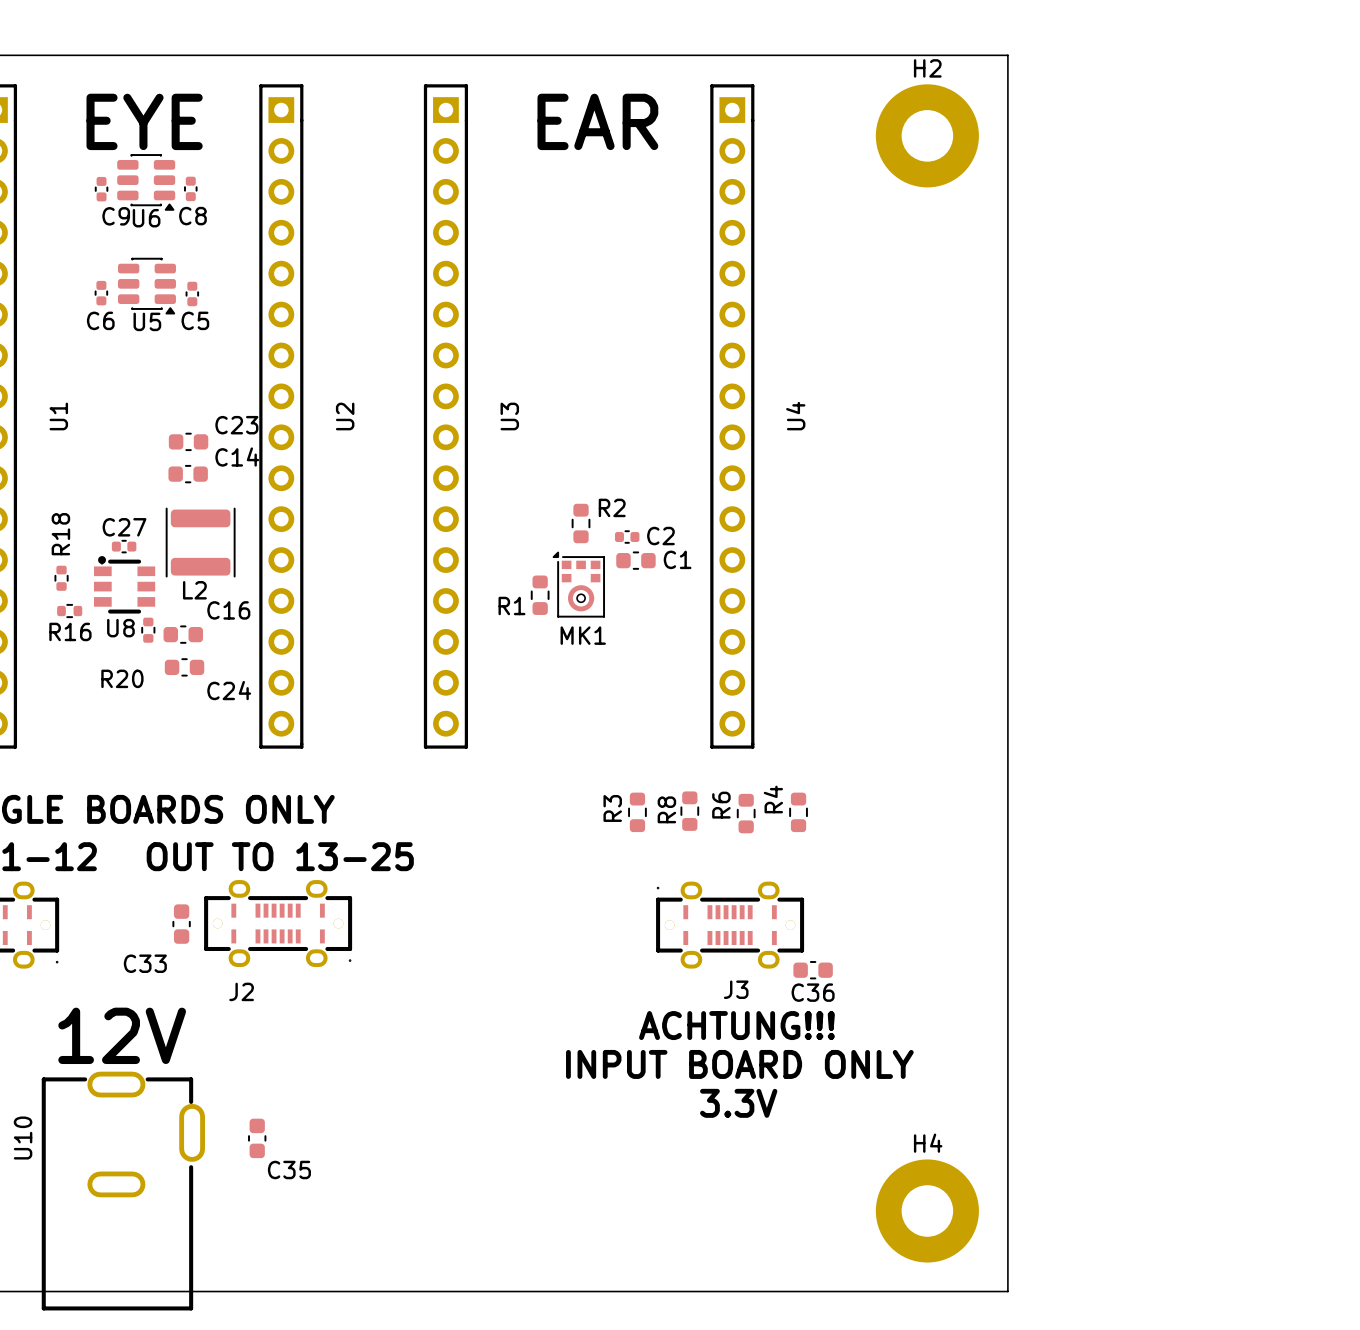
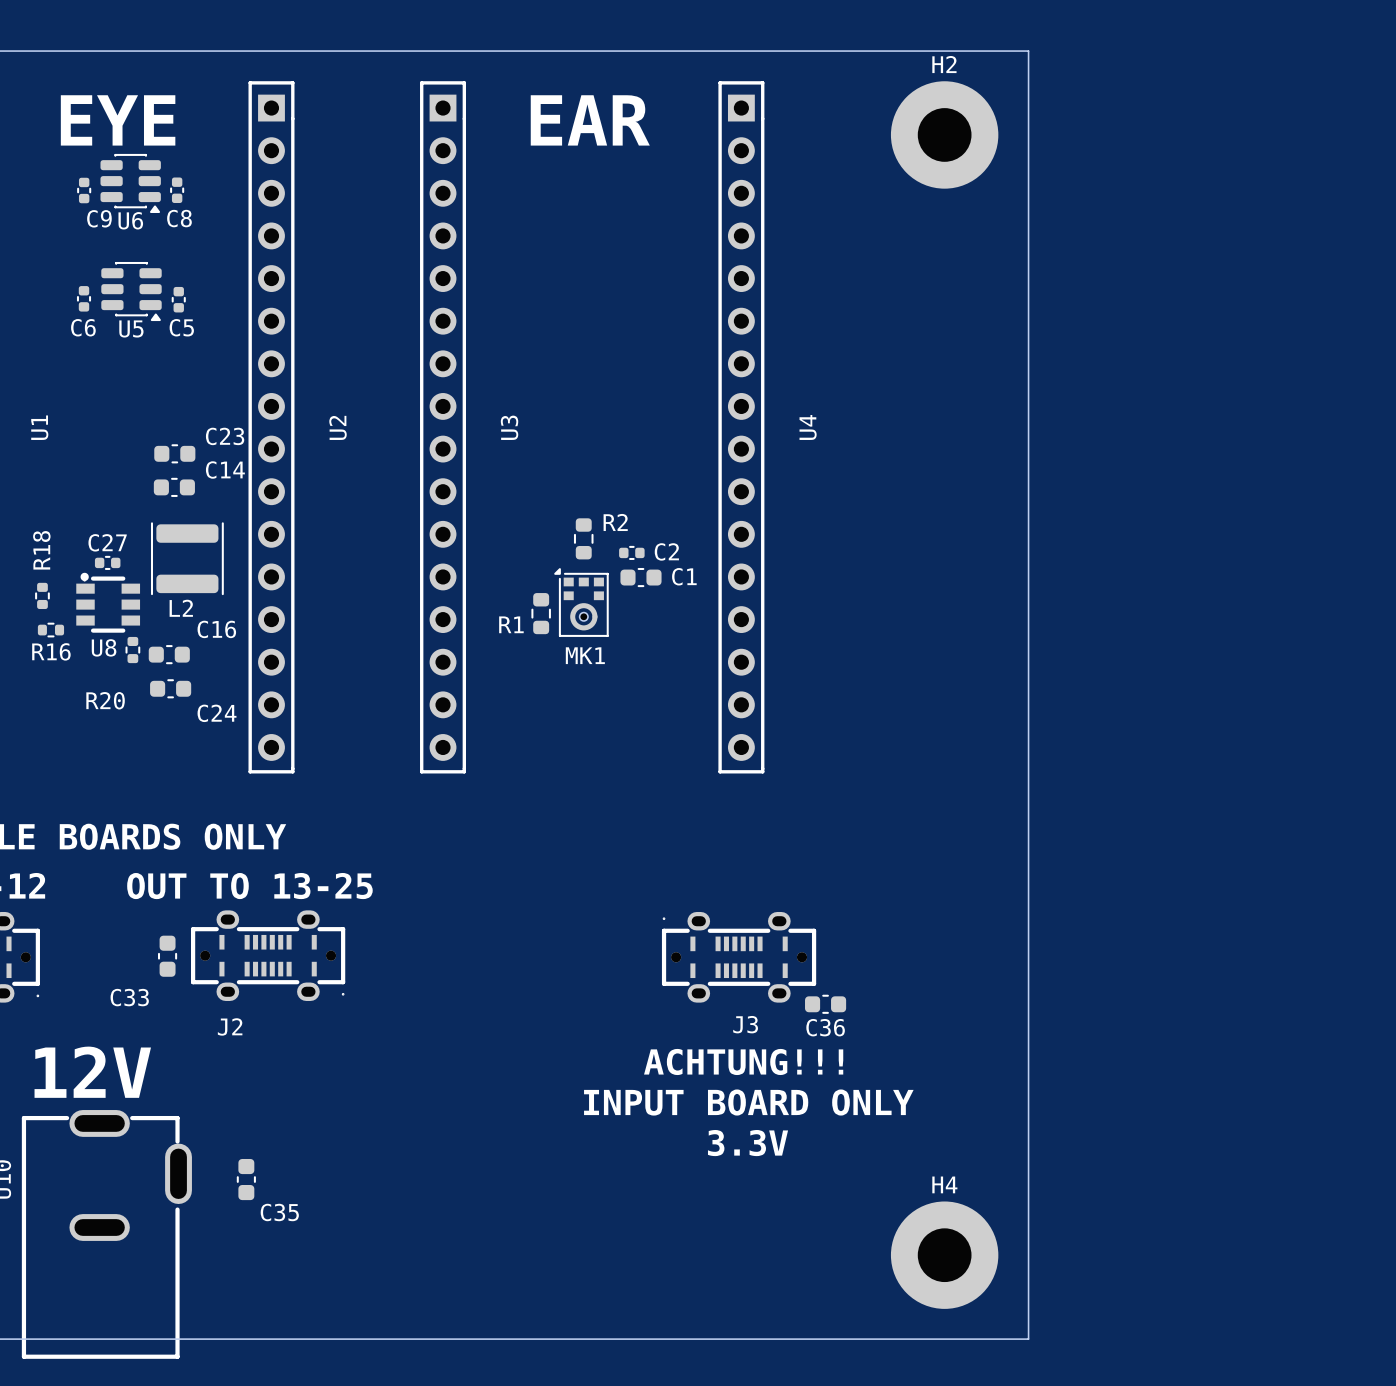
R8: (689, 811) -> none
R3: (637, 812) -> none
R4: (798, 812) -> none
R6: (746, 813) -> none

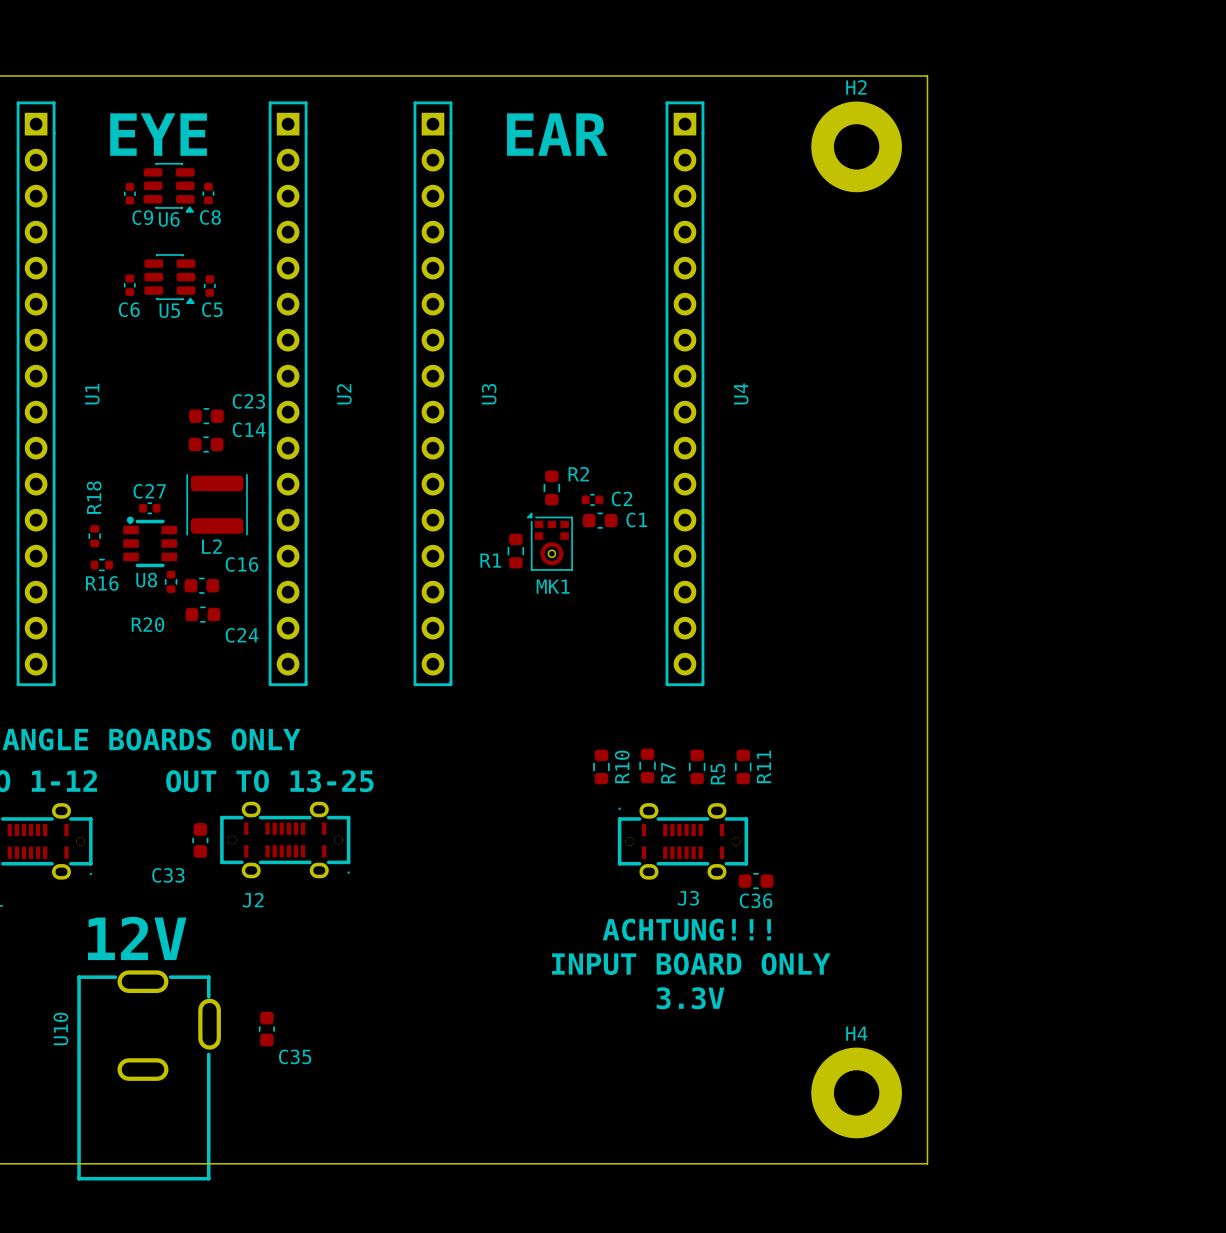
R7: none -> (647, 765)
R10: none -> (601, 766)
R5: none -> (697, 766)
R11: none -> (743, 766)

